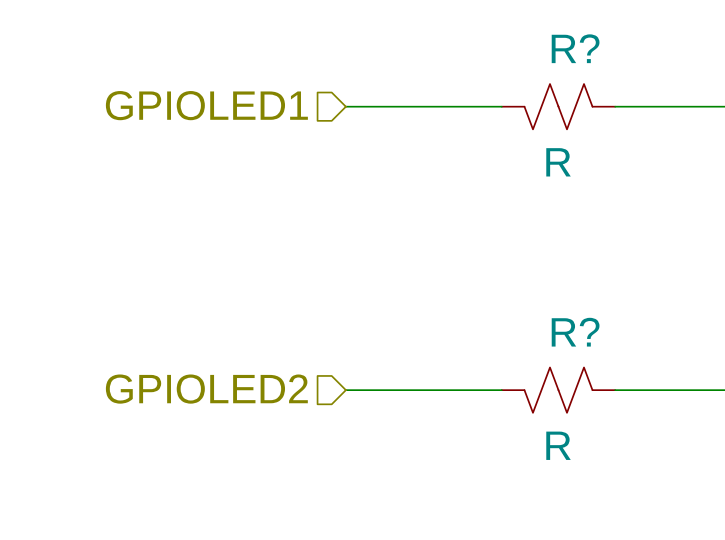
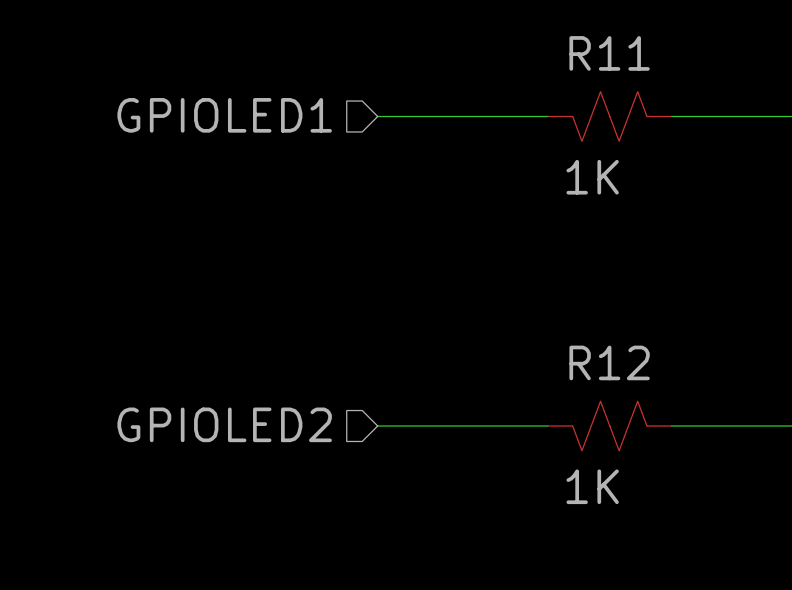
R? name: R? (575, 48) -> R11 (609, 53)
R? value: R (558, 162) -> 1K (592, 177)
R? name: R? (575, 332) -> R12 (609, 362)
R? value: R (558, 445) -> 1K (592, 486)

